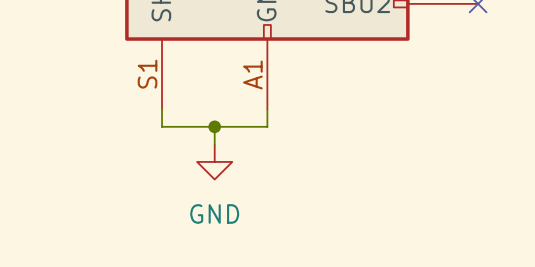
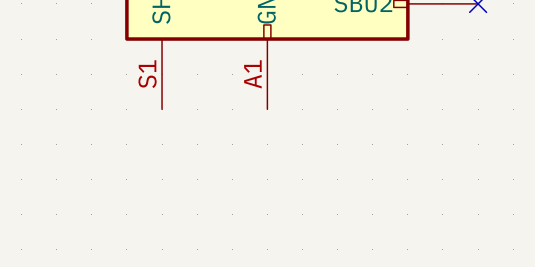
wire: (162, 109) (162, 126) (267, 126) (267, 109) -> none
wire: (214, 126) (214, 144) -> none
junction: (214, 126) -> none
power symbol: GND (214, 161) -> none

